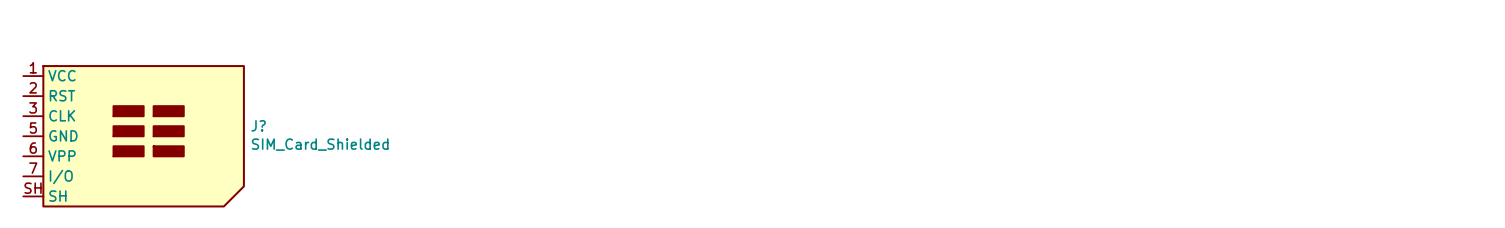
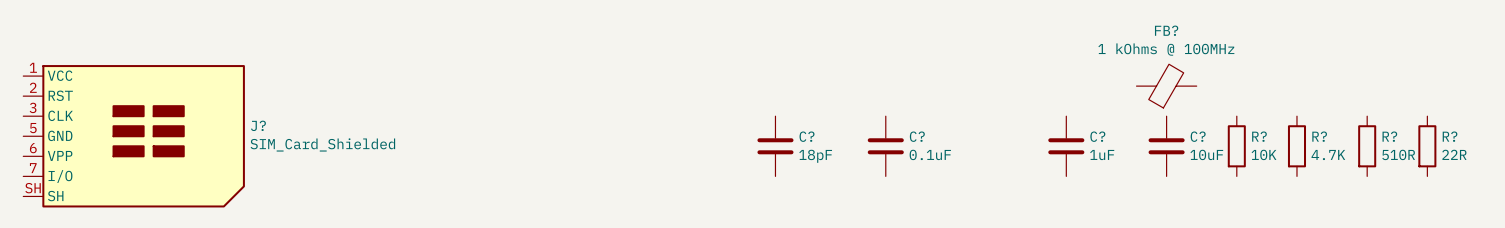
FB?: none -> 1 kOhms @ 100MHz (1166, 86)
C?: none -> 18pF (775, 146)
C?: none -> 0.1uF (885, 146)
C?: none -> 1uF (1066, 146)
C?: none -> 10uF (1166, 146)
R?: none -> 10K (1236, 146)
R?: none -> 4.7K (1296, 146)
R?: none -> 510R (1367, 146)
R?: none -> 22R (1427, 146)

